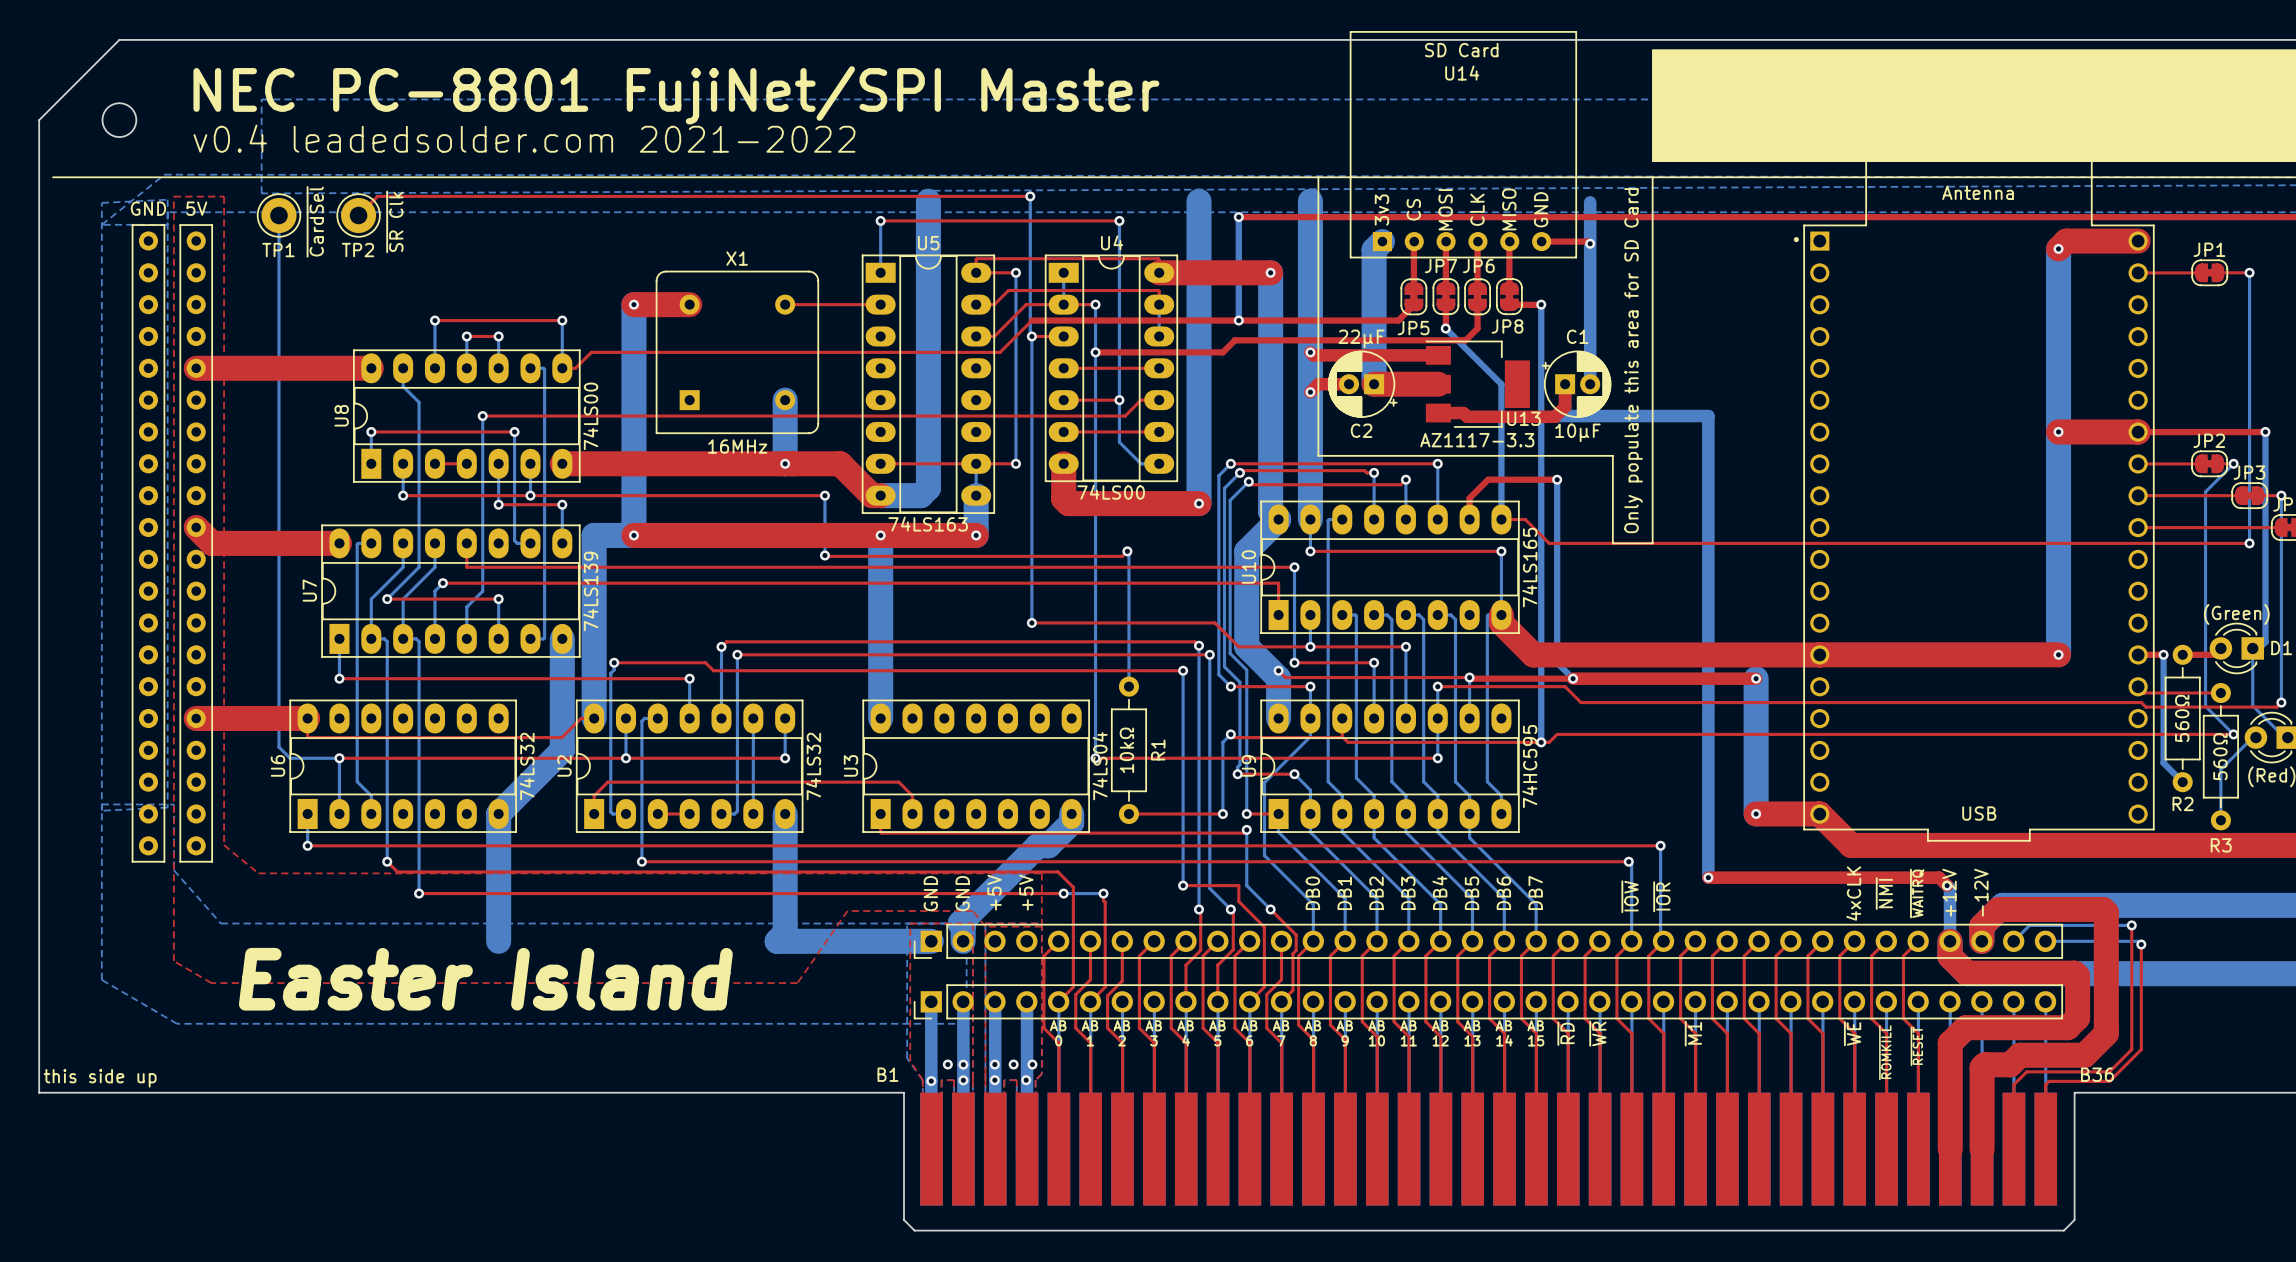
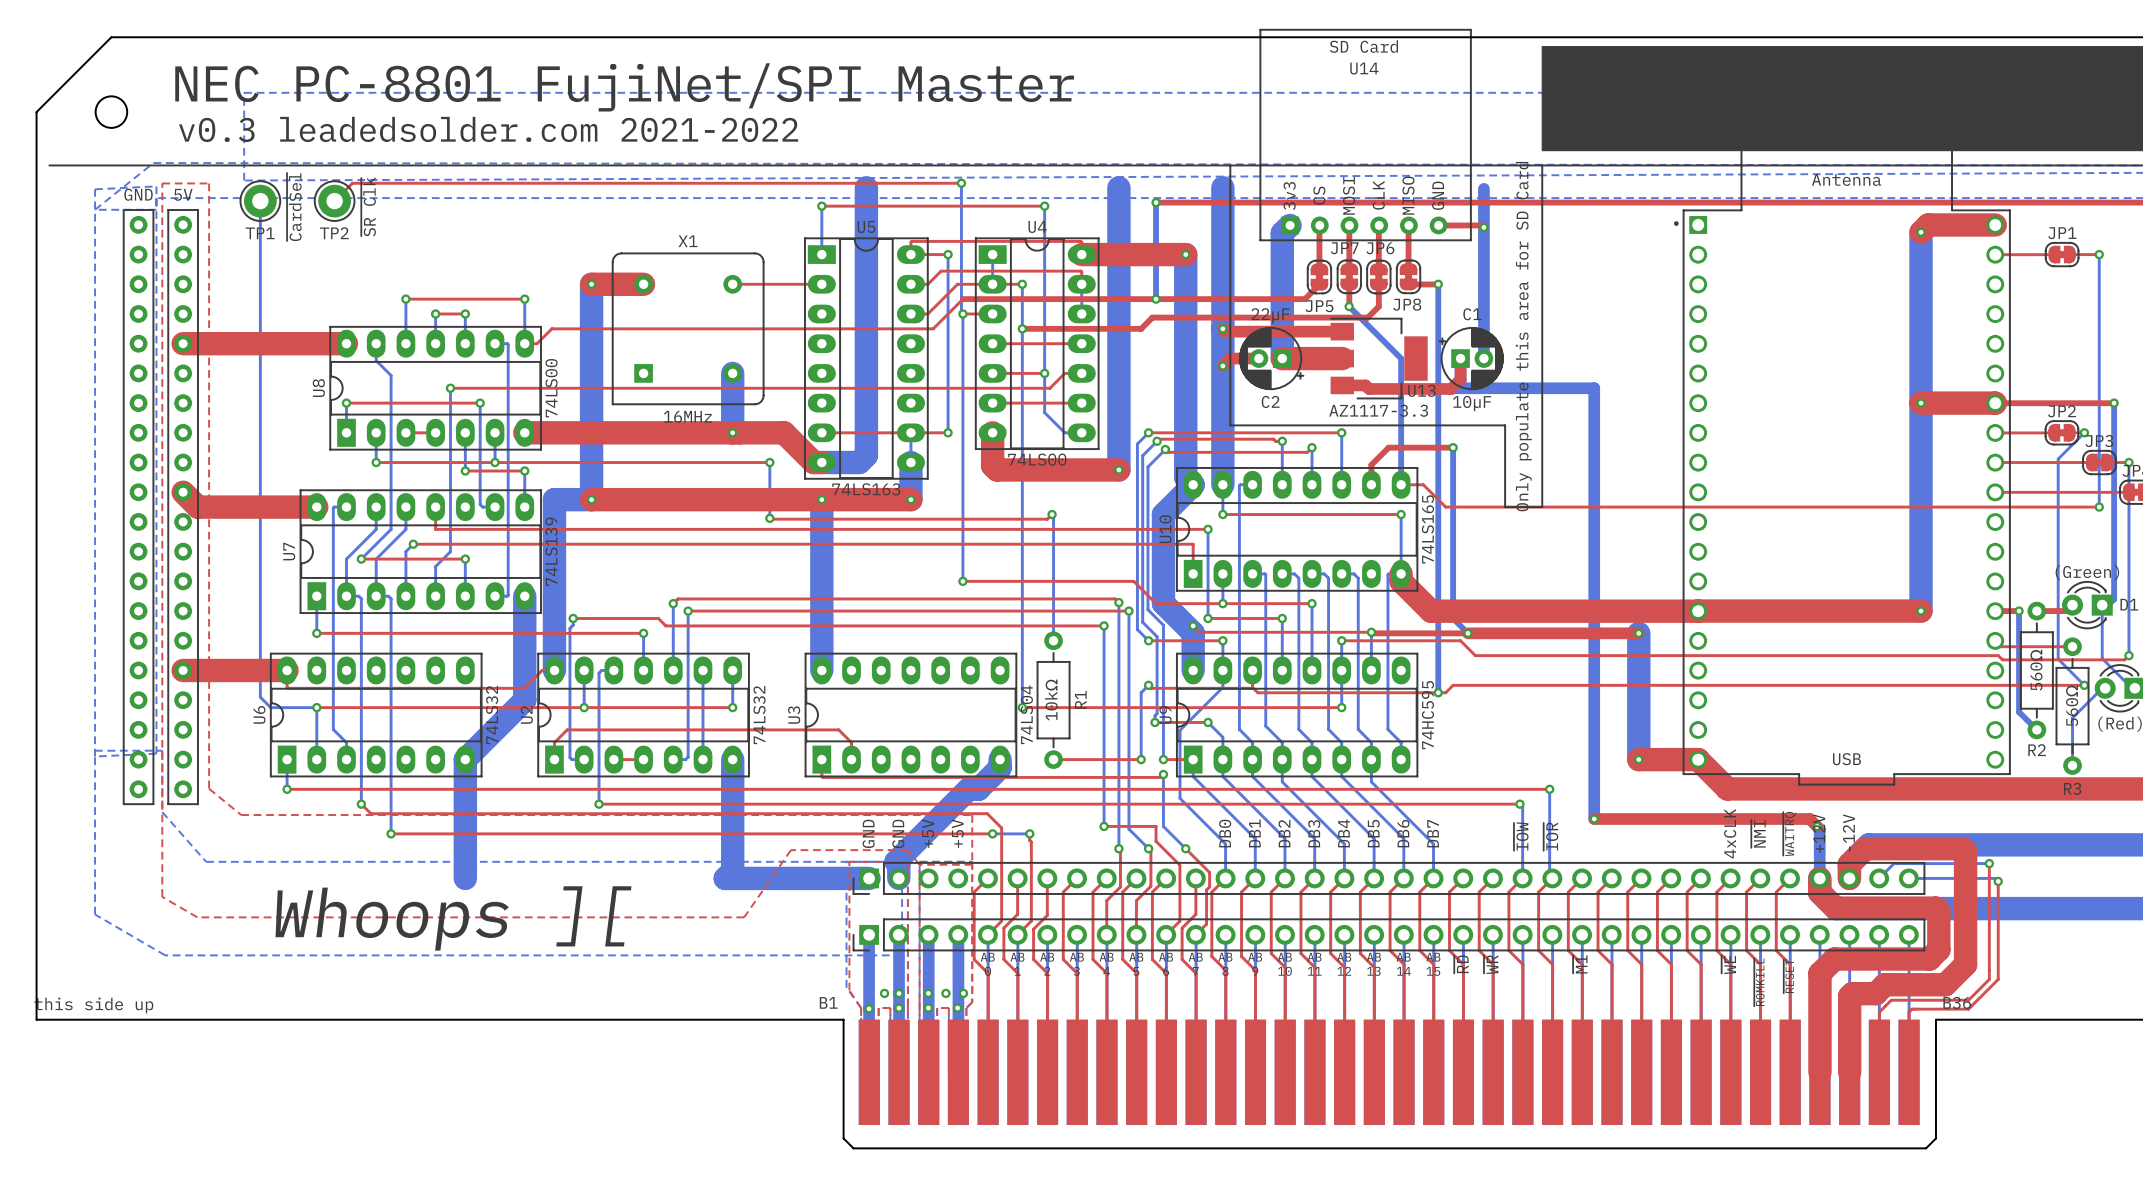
text: v0.4 leadedsolder.com 2021-2022 (524, 138) -> v0.3 leadedsolder.com 2021-2022 (488, 129)
text: Easter Island (485, 979) -> Whoops ][ (453, 918)

